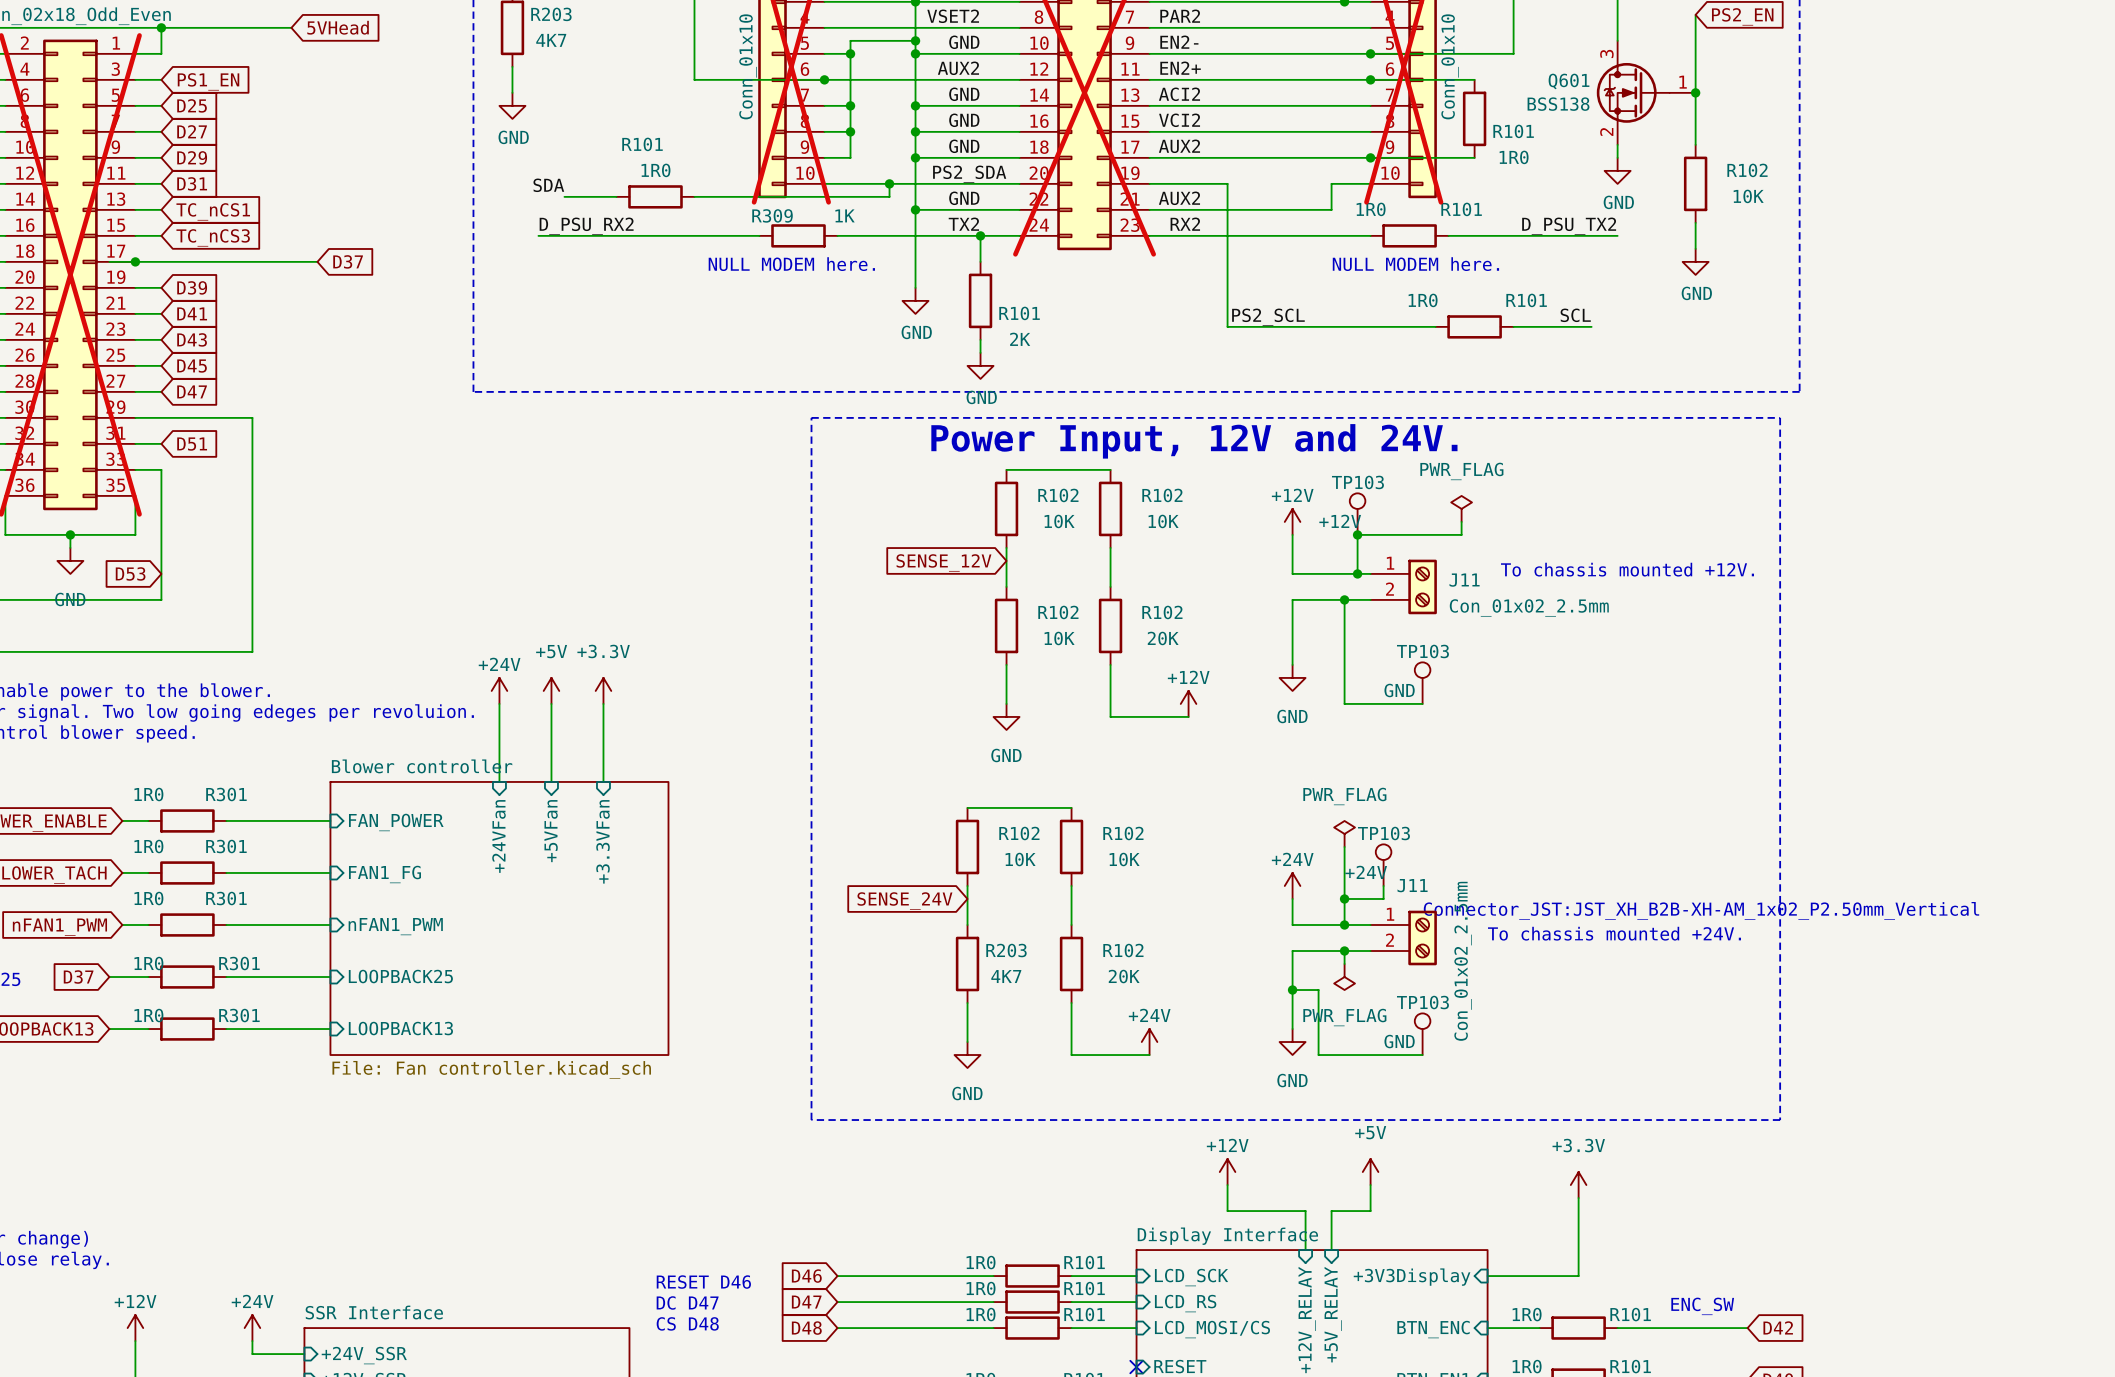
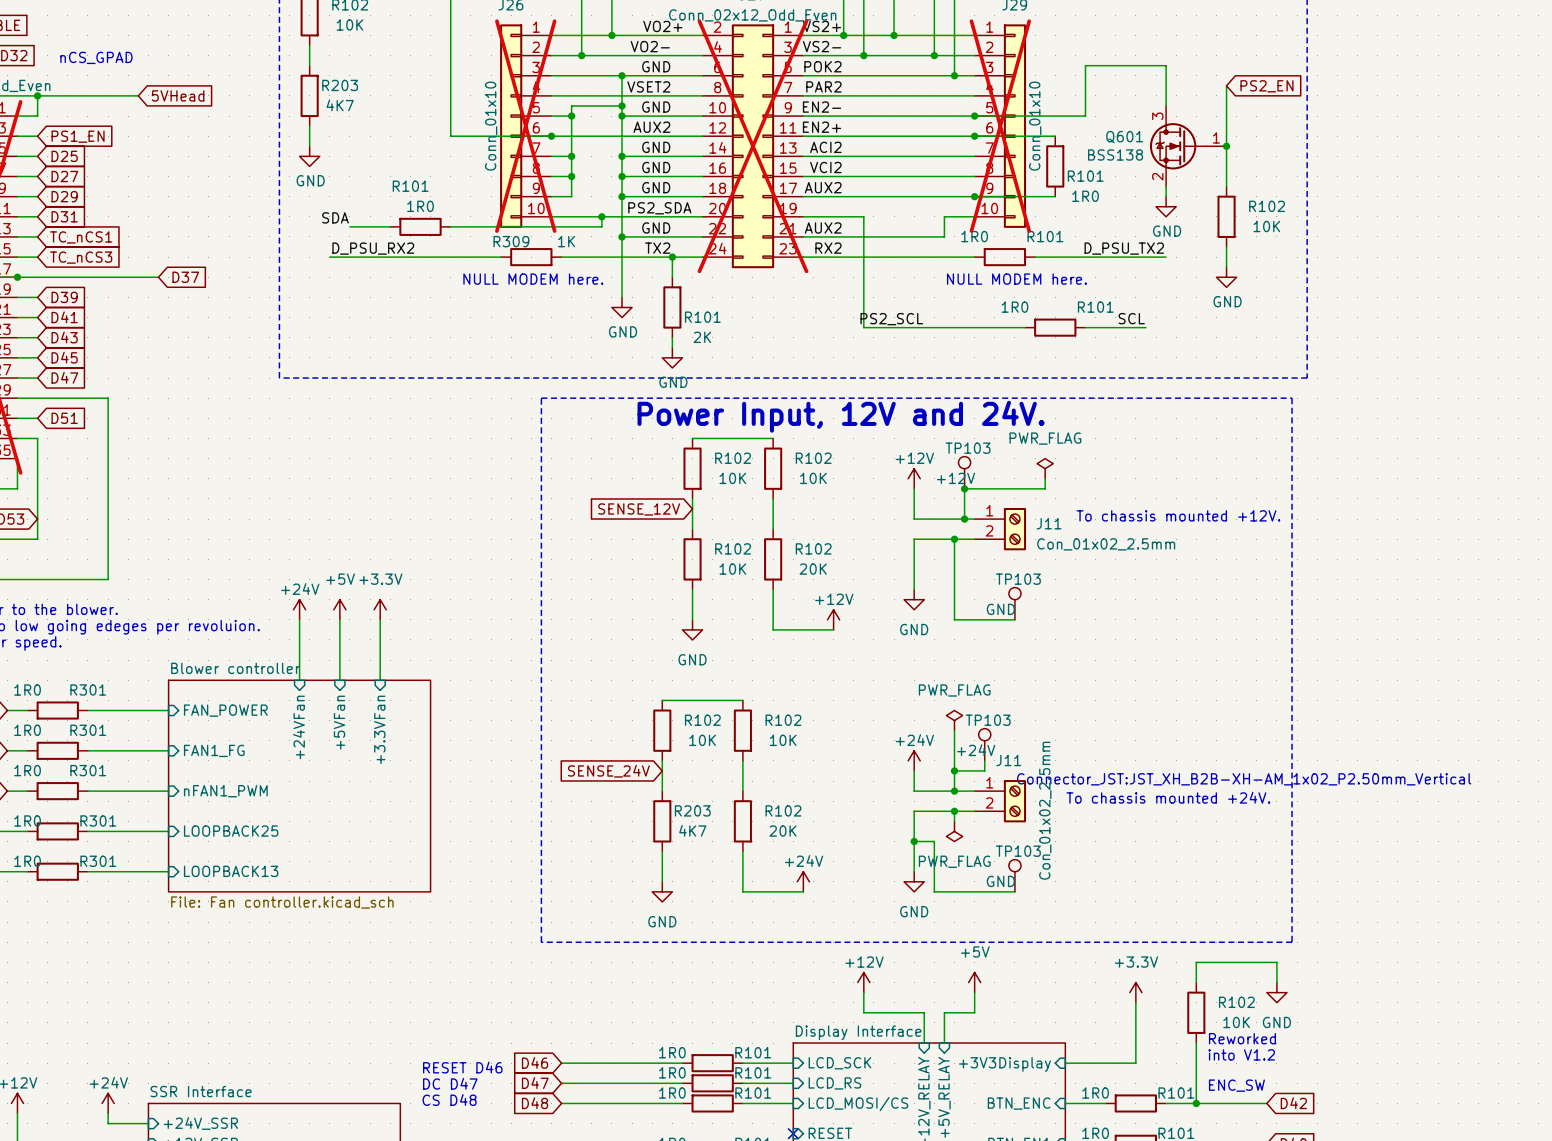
wire: none -> (1196, 982) (1196, 962) (1276, 962) (1276, 982)
power symbol: none -> GND (1276, 992)
R102: none -> 10K (1196, 1012)
text: none -> Reworked (1242, 1038)
wire: none -> (1196, 1043) (1196, 1103)
text: none -> into V1.2 (1241, 1054)
junction: none -> (1196, 1103)

